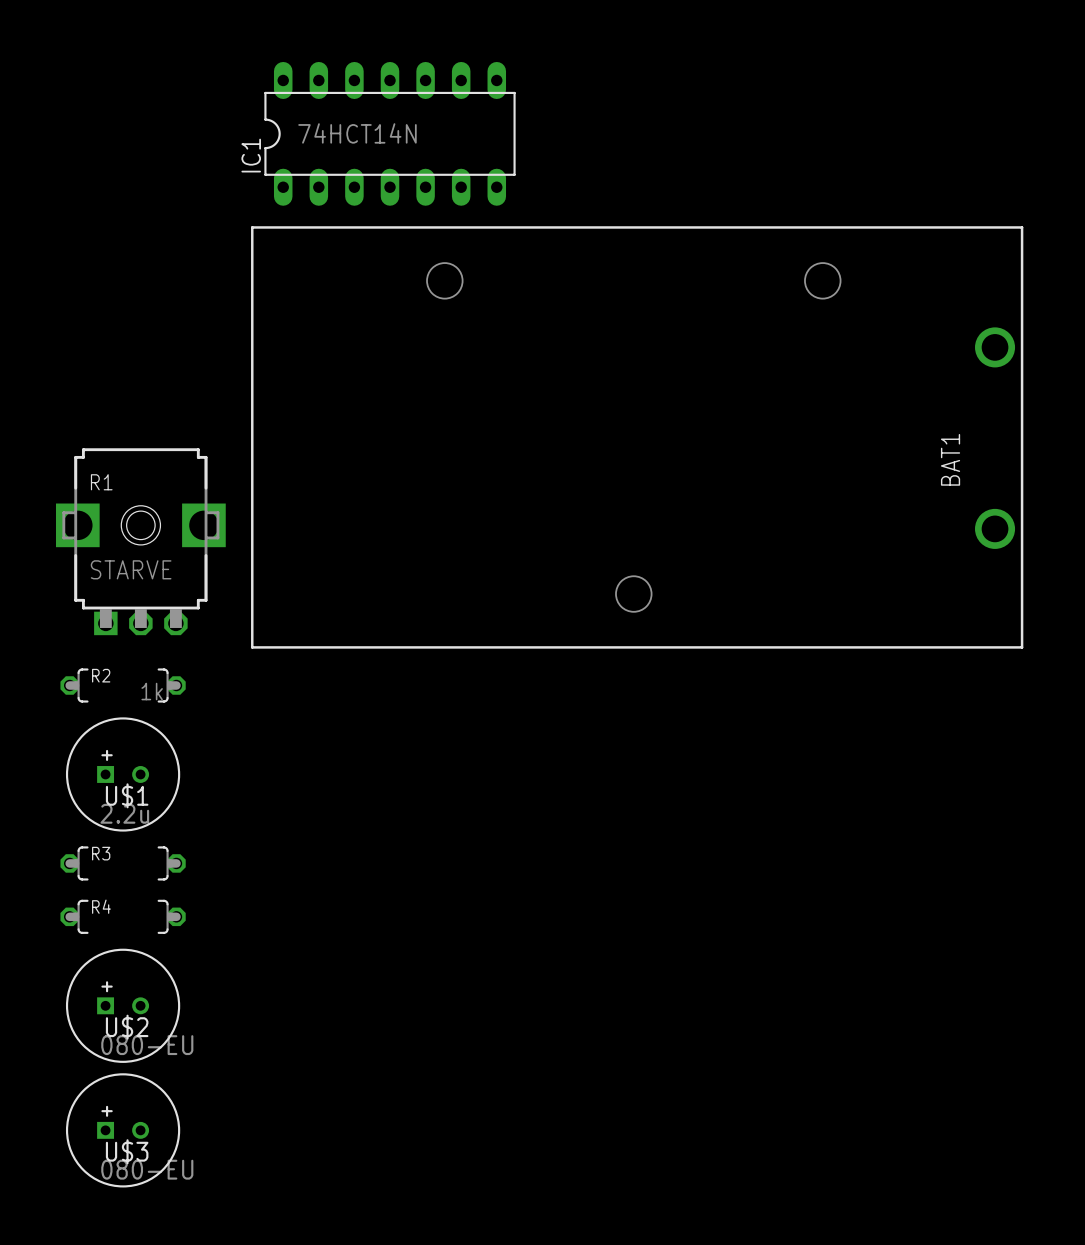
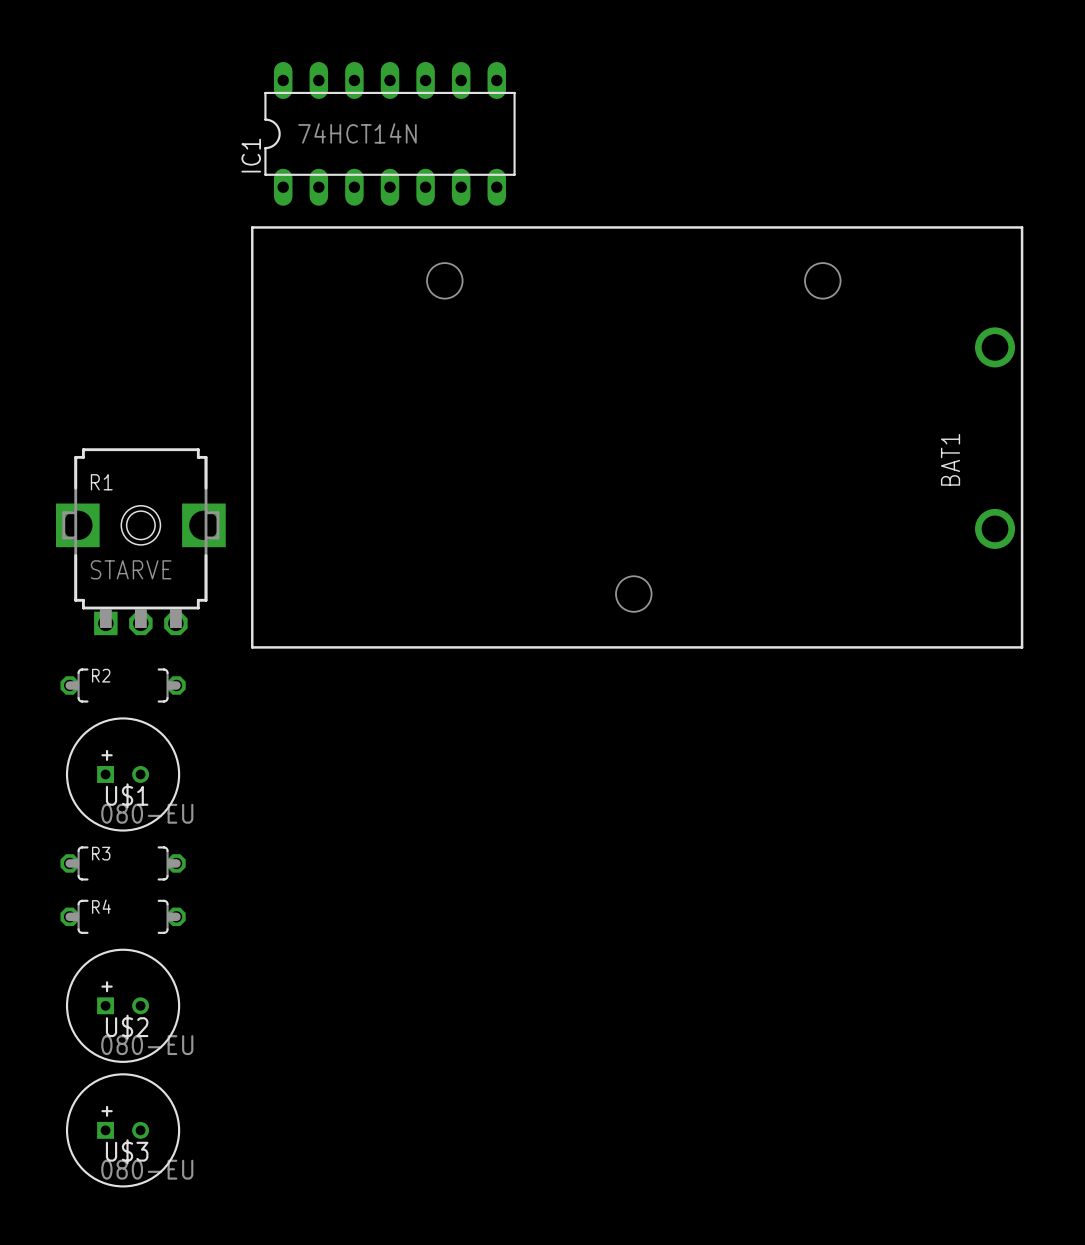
R2 value: 1k (152, 691) -> none
U$1 value: 2.2u (124, 813) -> 080-EU (147, 813)

